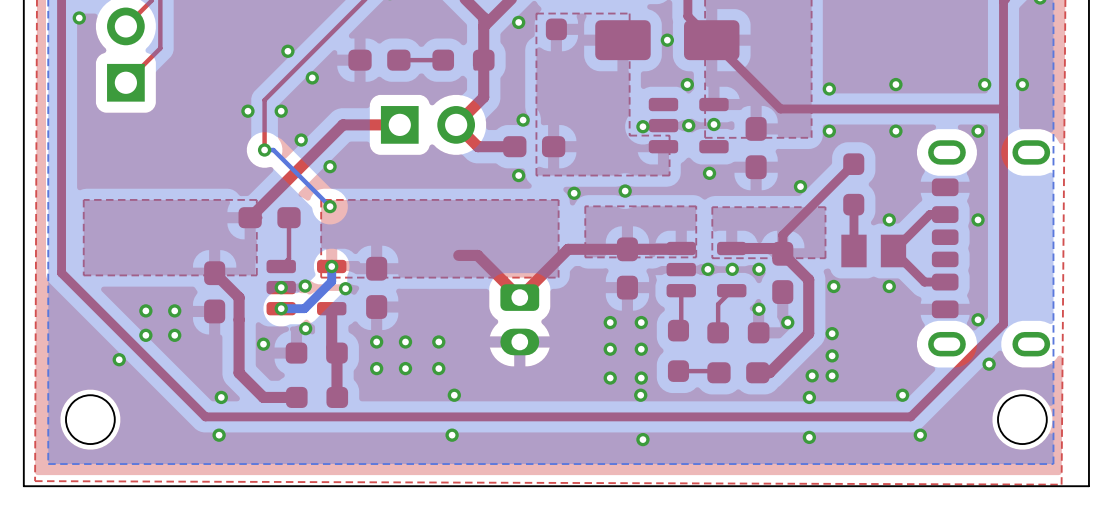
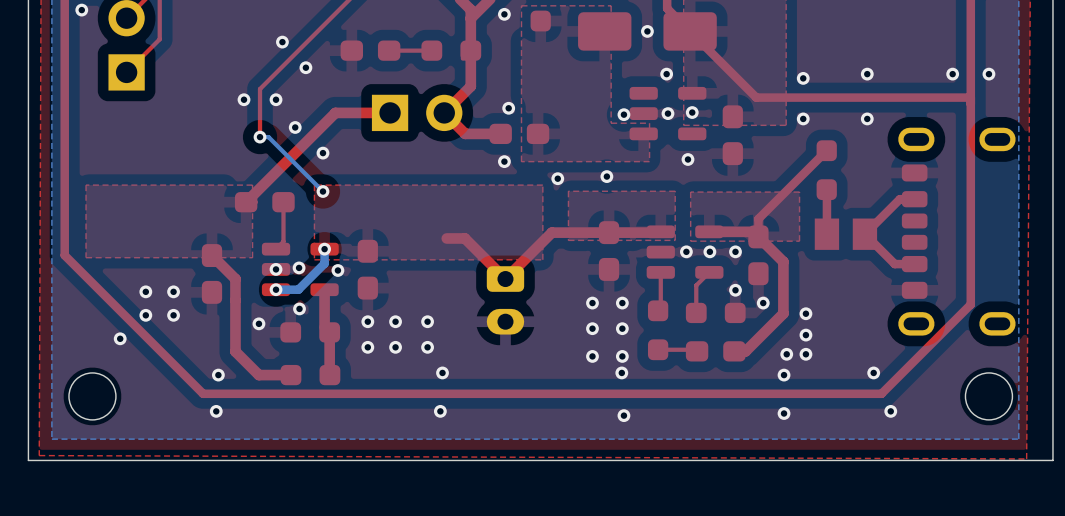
via: (978, 131) -> none
via: (800, 186) -> none
via: (889, 219) -> none
via: (978, 219) -> none
via: (833, 286) -> none
via: (889, 286) -> none
via: (978, 319) -> none
via: (989, 364) -> none

